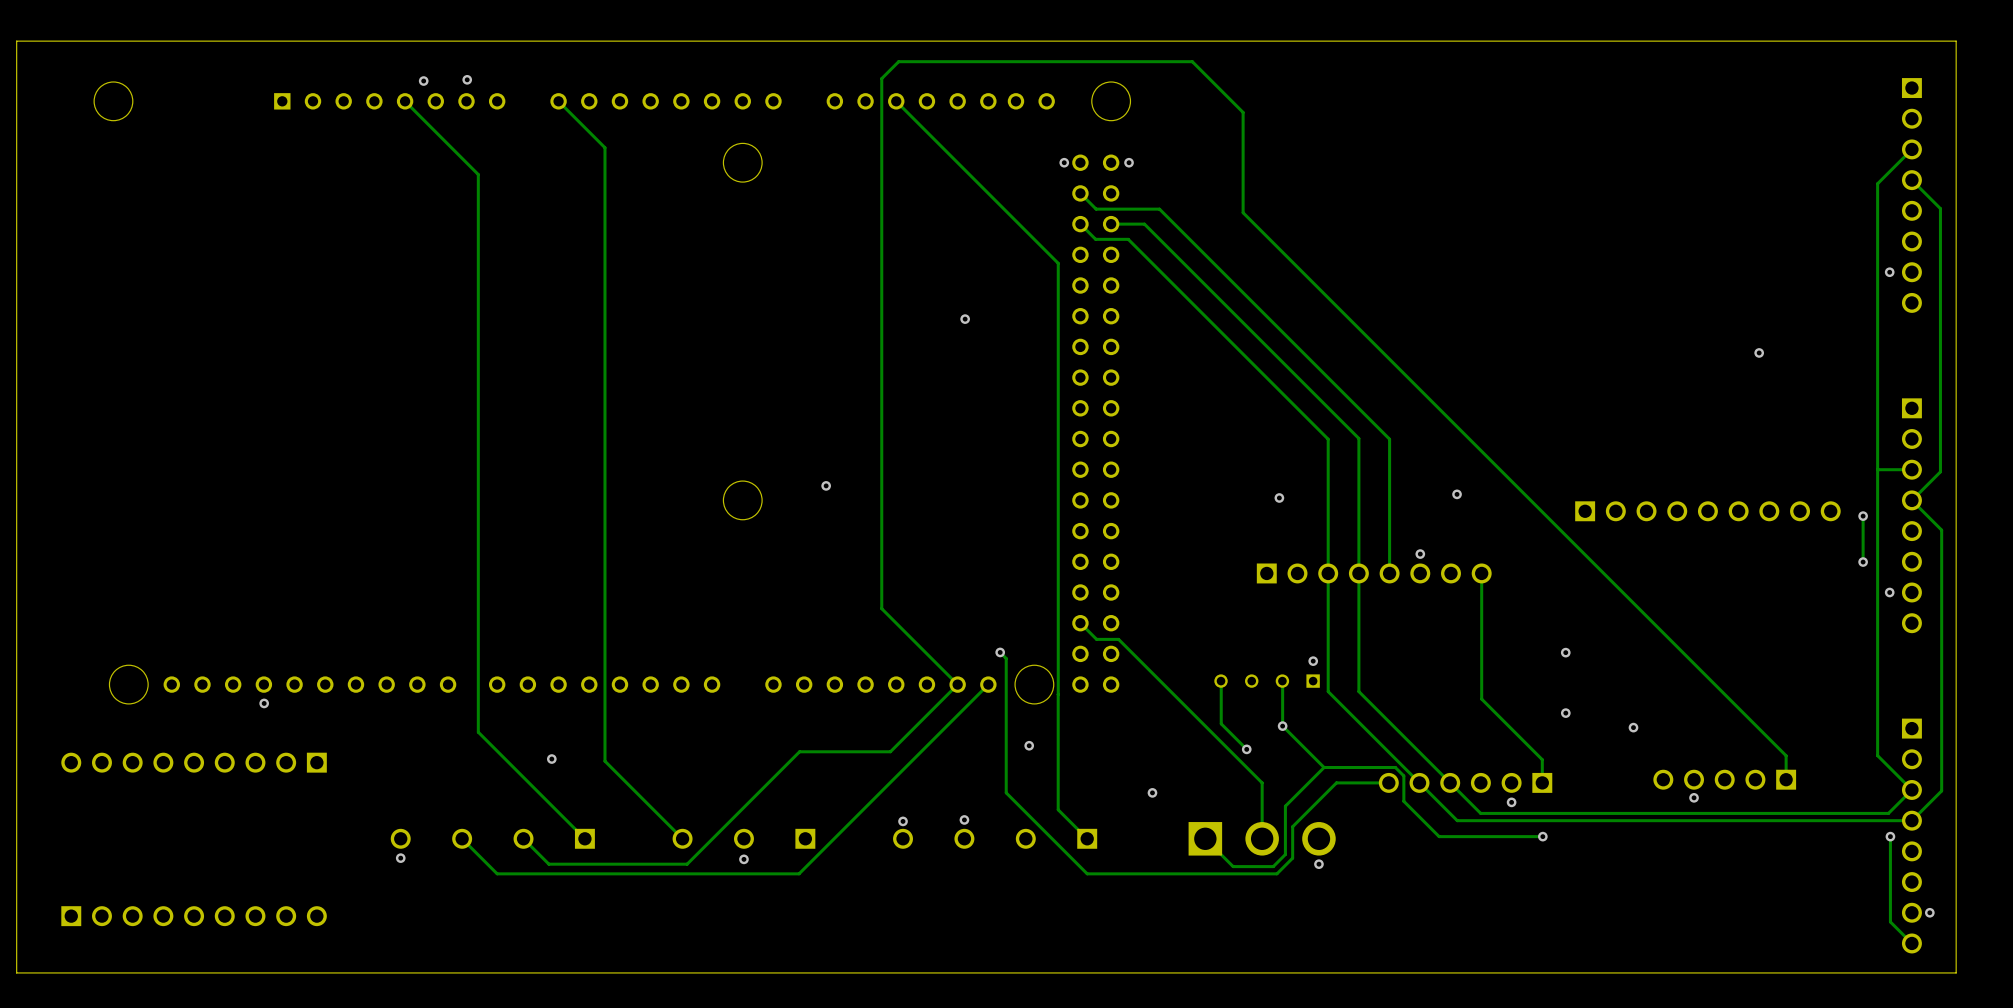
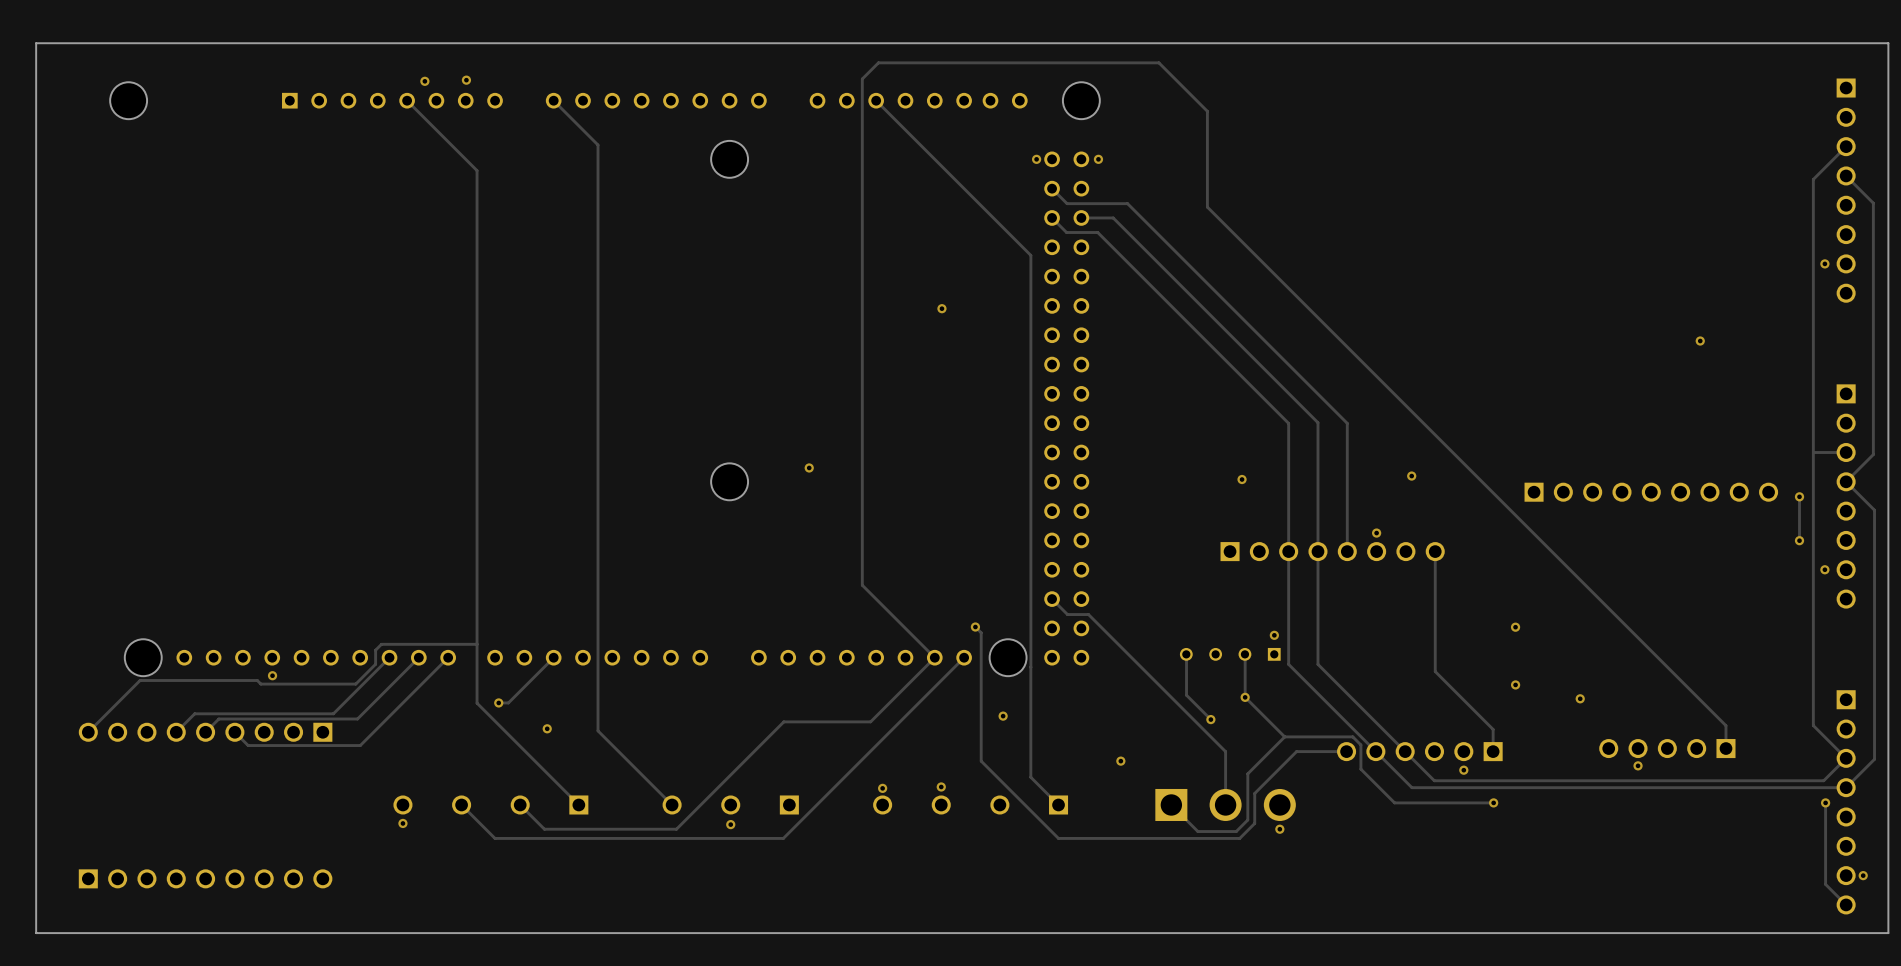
track: none -> (477, 644) (381, 644) (375, 650) (375, 664) (355, 684) (260, 684) (257, 680) (140, 680) (88, 732)
track: none -> (389, 657) (333, 713) (194, 713) (176, 732)
track: none -> (418, 657) (357, 719) (218, 719) (205, 732)
track: none -> (448, 657) (360, 745) (248, 745) (234, 732)
track: none -> (553, 657) (508, 702) (498, 702)
via: none -> (498, 702)

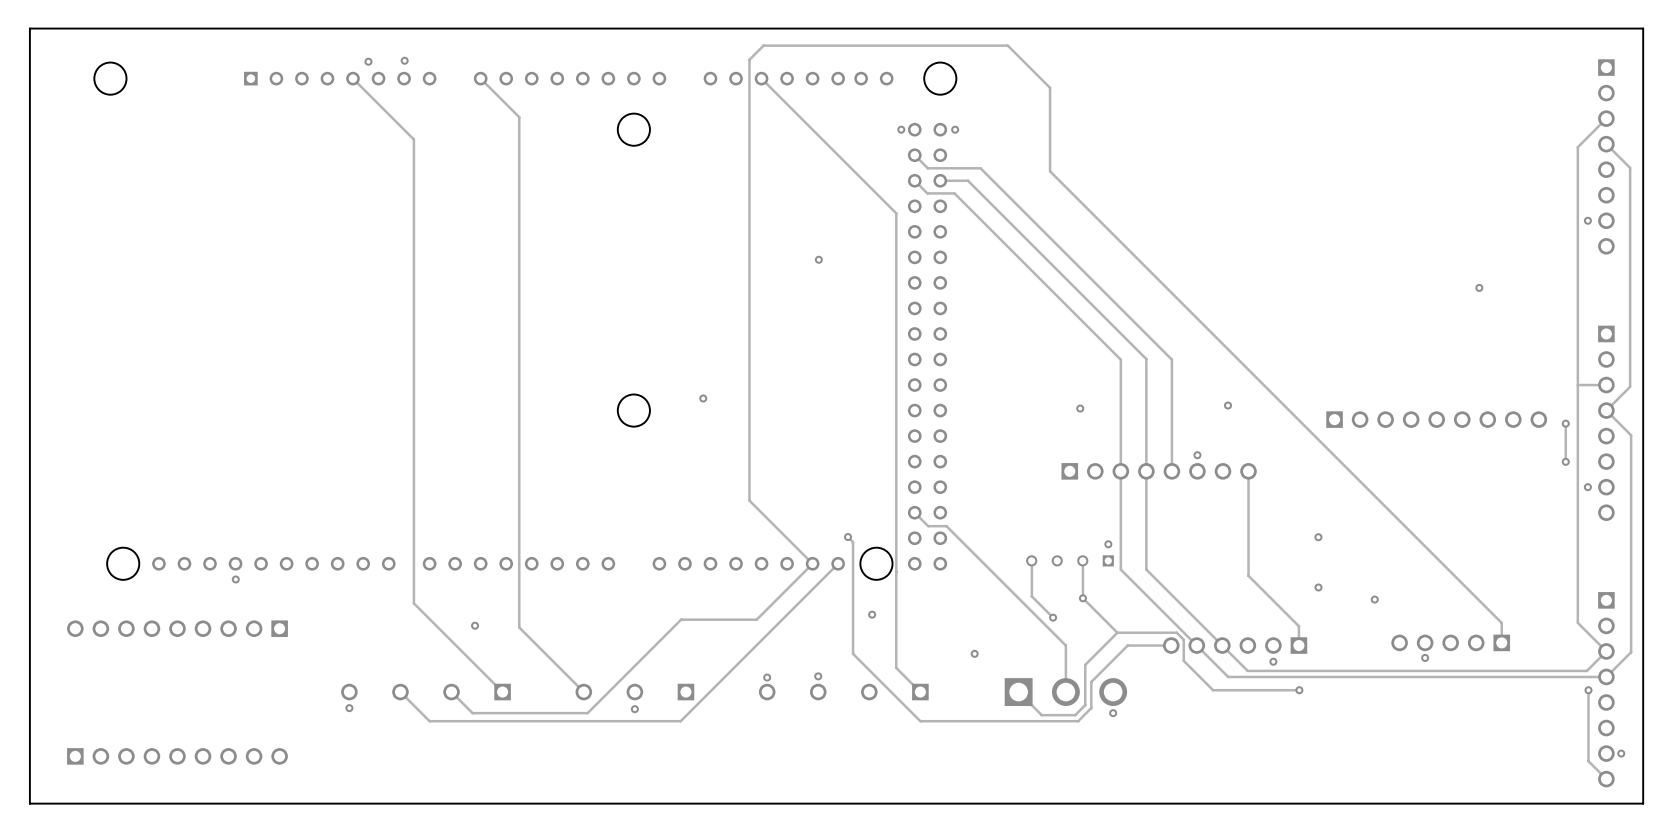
track: (477, 644) (381, 644) (375, 650) (375, 664) (355, 684) (260, 684) (257, 680) (140, 680) (88, 732) -> none
track: (389, 657) (333, 713) (194, 713) (176, 732) -> none
track: (418, 657) (357, 719) (218, 719) (205, 732) -> none
track: (448, 657) (360, 745) (248, 745) (234, 732) -> none
track: (553, 657) (508, 702) (498, 702) -> none
via: (498, 702) -> none

